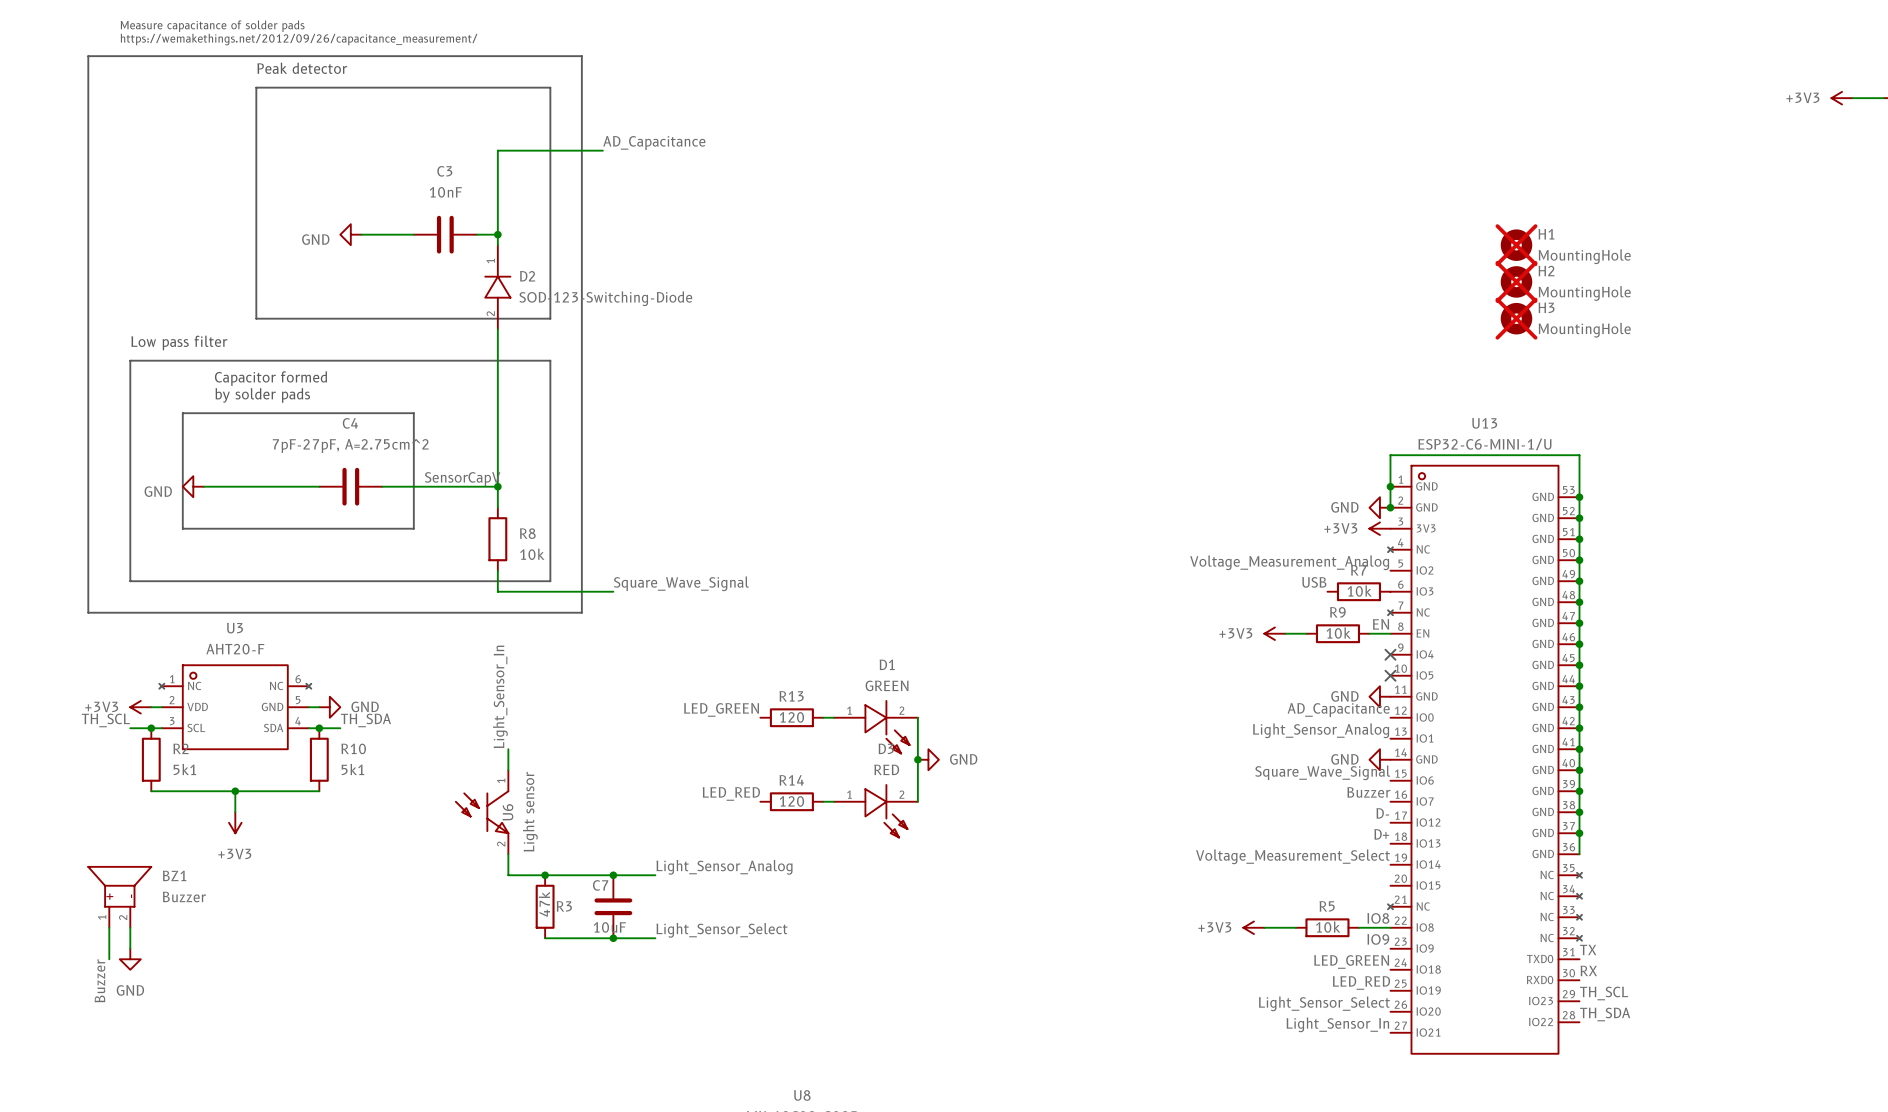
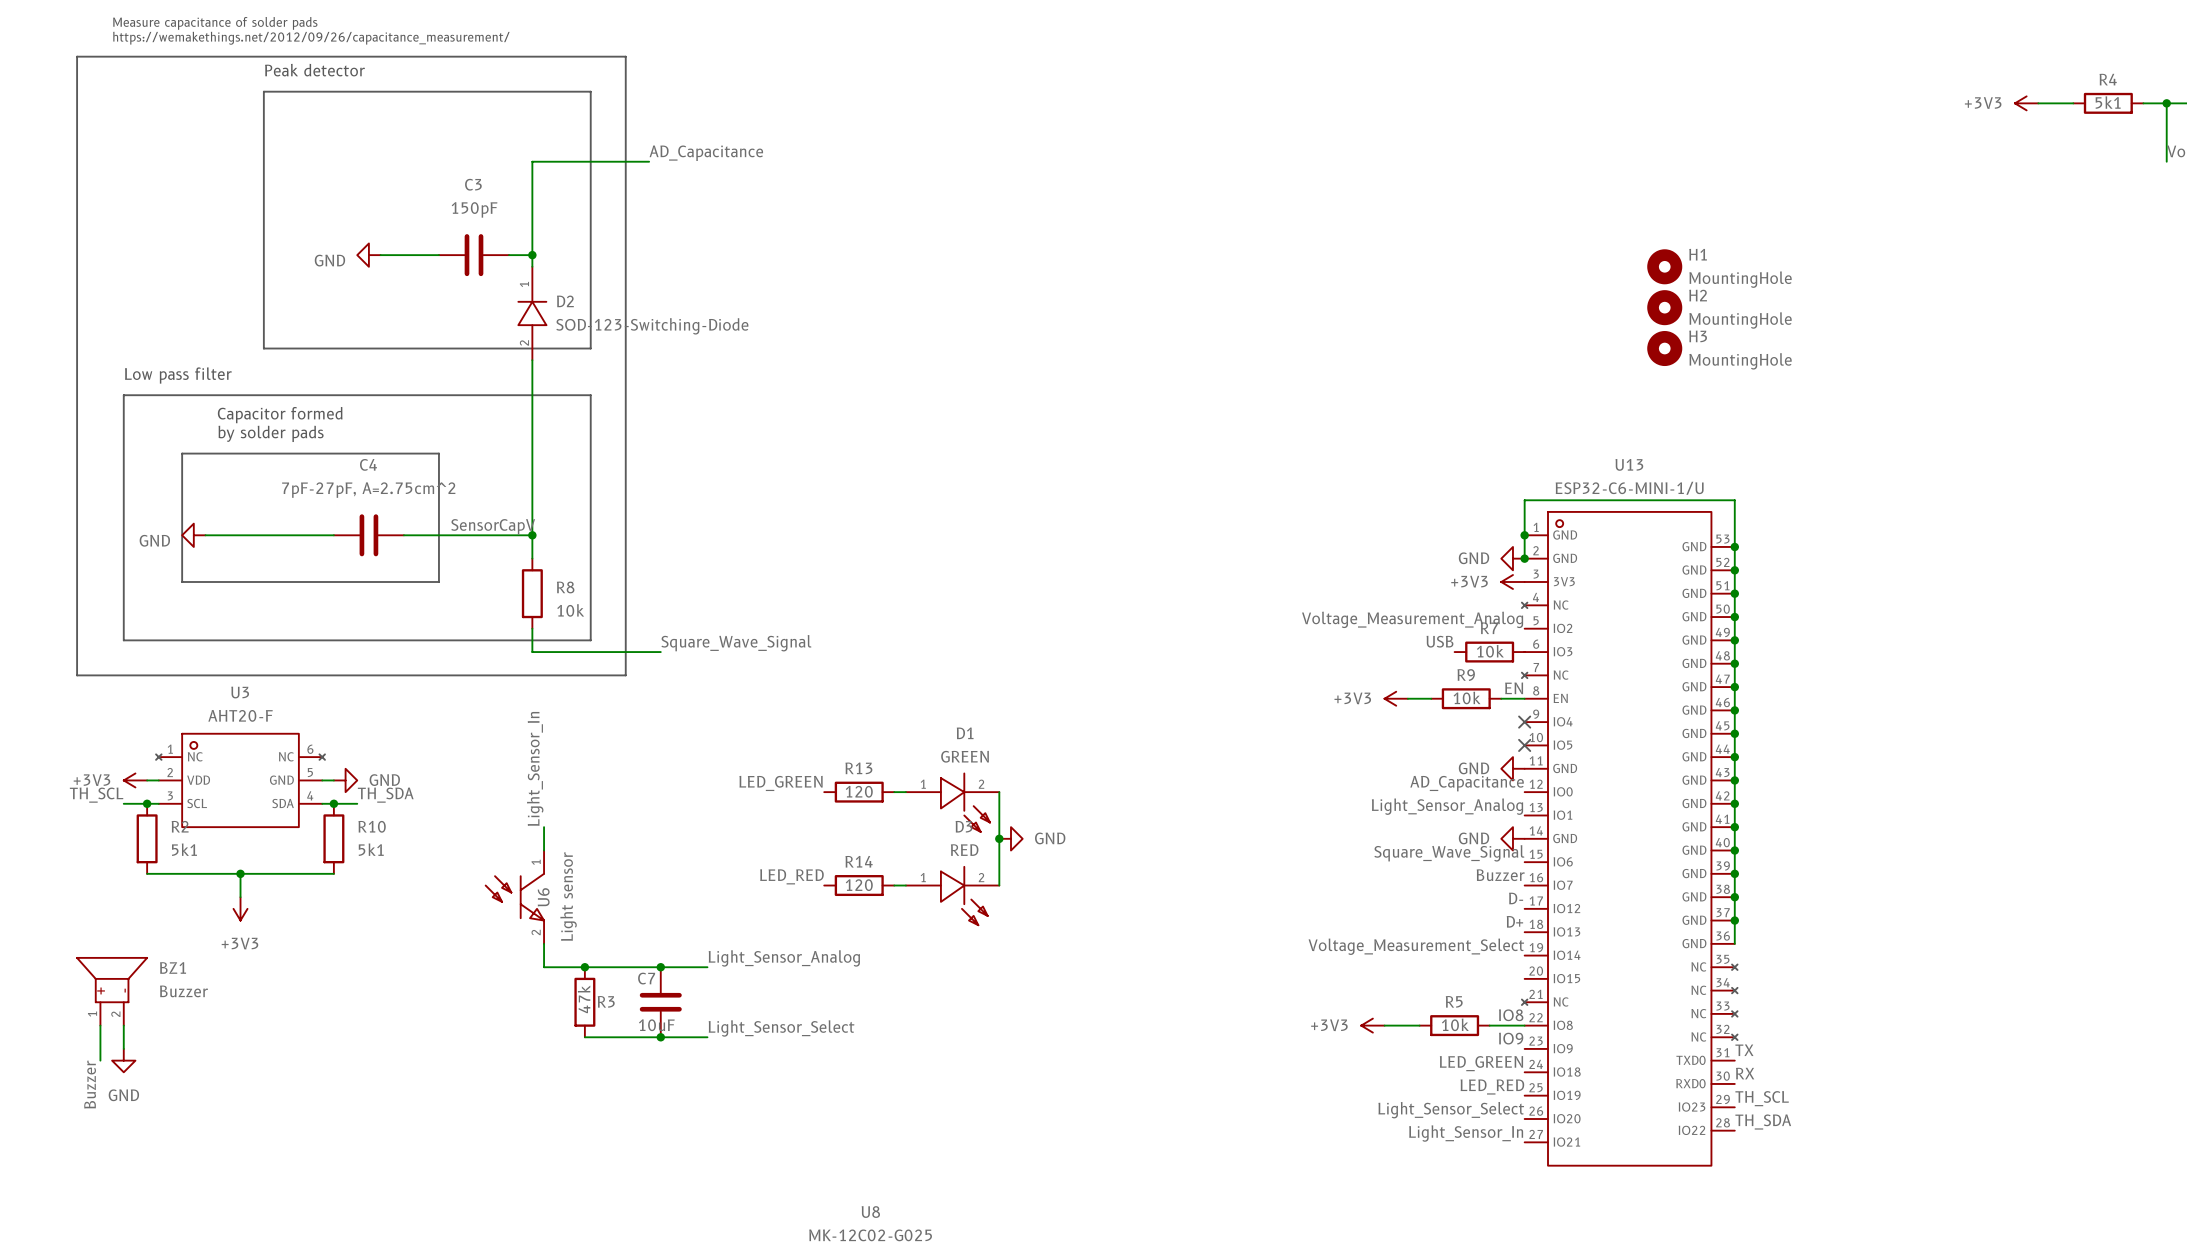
C3 value: 10nF (445, 192) -> 150pF (474, 209)
H1 do-not-place cross: (1516, 245) -> none
H2 do-not-place cross: (1516, 281) -> none
H3 do-not-place cross: (1516, 318) -> none

